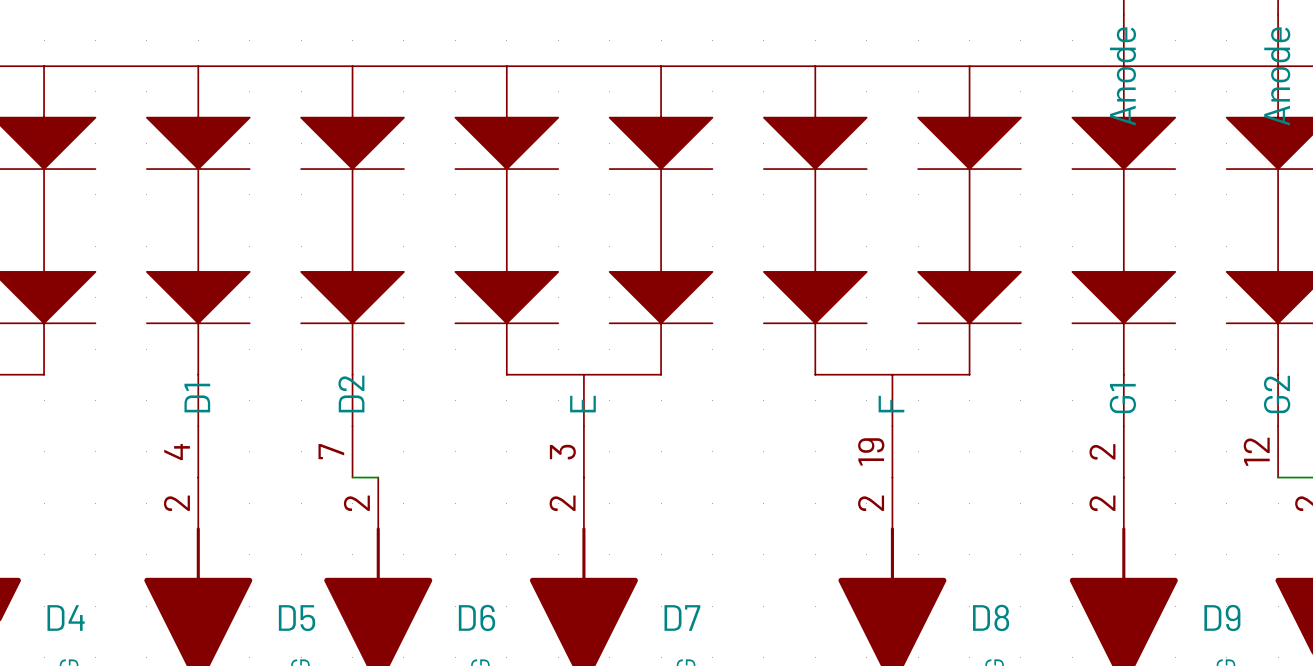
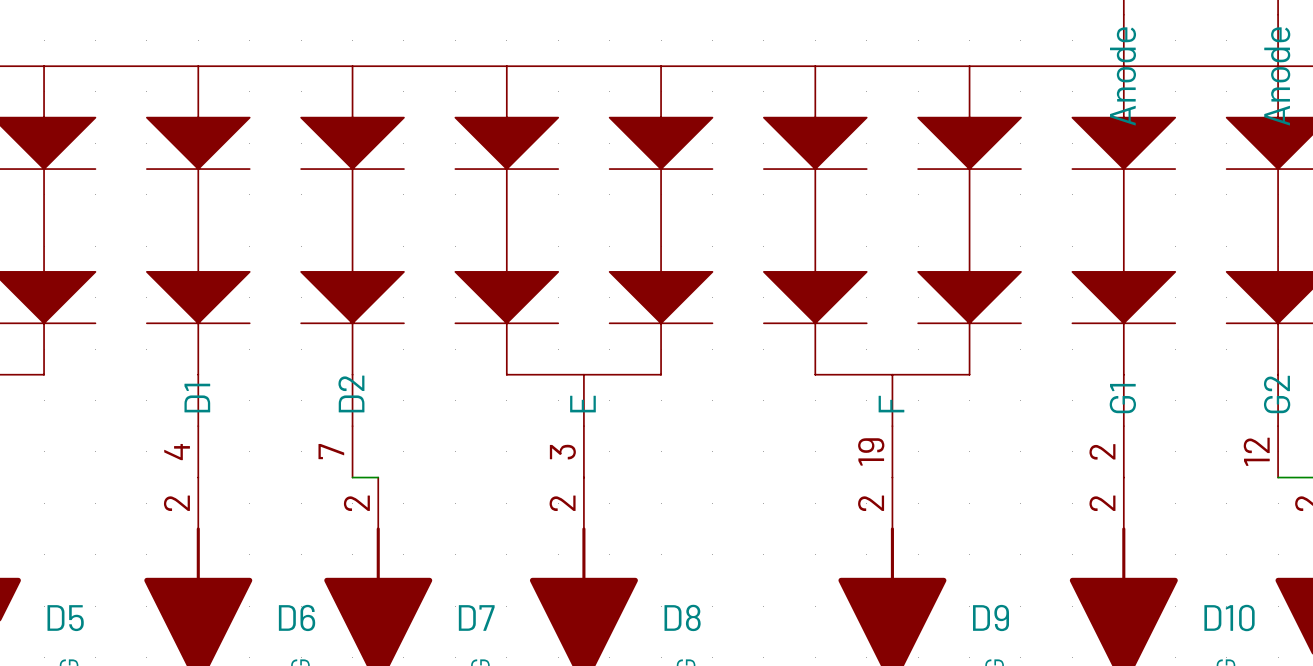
D4 name: D4 (66, 617) -> D5 (65, 618)
D6 name: D6 (476, 617) -> D7 (476, 617)
D7 name: D7 (682, 617) -> D8 (682, 617)
D8 name: D8 (991, 617) -> D9 (991, 618)
D5 name: D5 (297, 618) -> D6 (297, 617)
D9 name: D9 (1222, 618) -> D10 (1229, 618)

